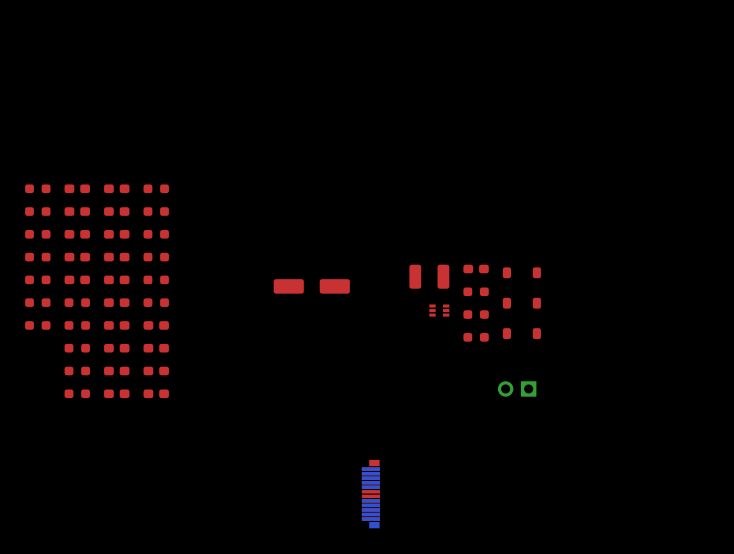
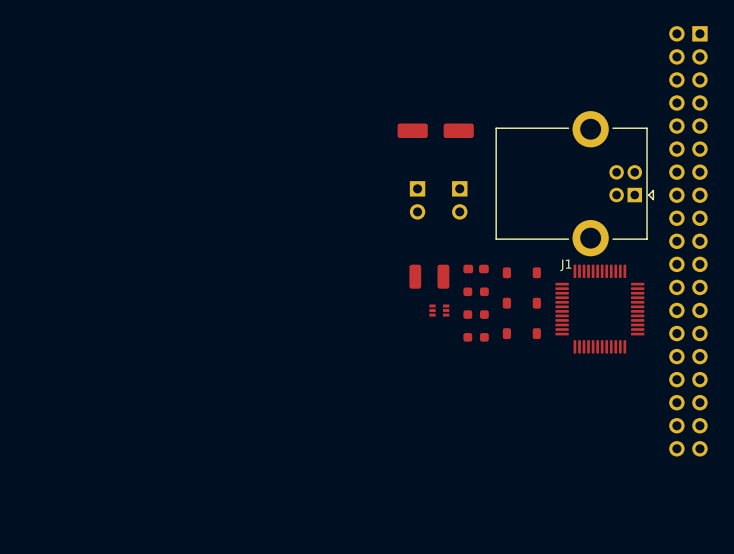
J1: none -> (574, 183)
part: (37, 188) -> none
part: (77, 188) -> none
part: (116, 188) -> none
part: (156, 188) -> none
part: none -> (417, 200)
part: none -> (459, 200)
part: (37, 211) -> none
part: (77, 211) -> none
part: (116, 211) -> none
part: (156, 211) -> none
part: (37, 234) -> none
part: (77, 234) -> none
part: (116, 234) -> none
part: (156, 234) -> none
part: none -> (688, 241)
part: (37, 257) -> none
part: (77, 257) -> none
part: (116, 257) -> none
part: (156, 257) -> none
part: (37, 279) -> none
part: (77, 279) -> none
part: (116, 279) -> none
part: (156, 279) -> none
part position: (311, 286) -> (435, 130)
part: (37, 302) -> none
part: (77, 302) -> none
part: (116, 302) -> none
part: (156, 302) -> none
part: none -> (599, 309)
part: (37, 325) -> none
part: (77, 325) -> none
part: (116, 325) -> none
part: (156, 325) -> none
part: (77, 348) -> none
part: (116, 348) -> none
part: (156, 348) -> none
part: (77, 371) -> none
part: (116, 371) -> none
part: (156, 371) -> none
part: (517, 388) -> none
part: (77, 393) -> none
part: (116, 393) -> none
part: (156, 393) -> none
part: (370, 494) -> none

